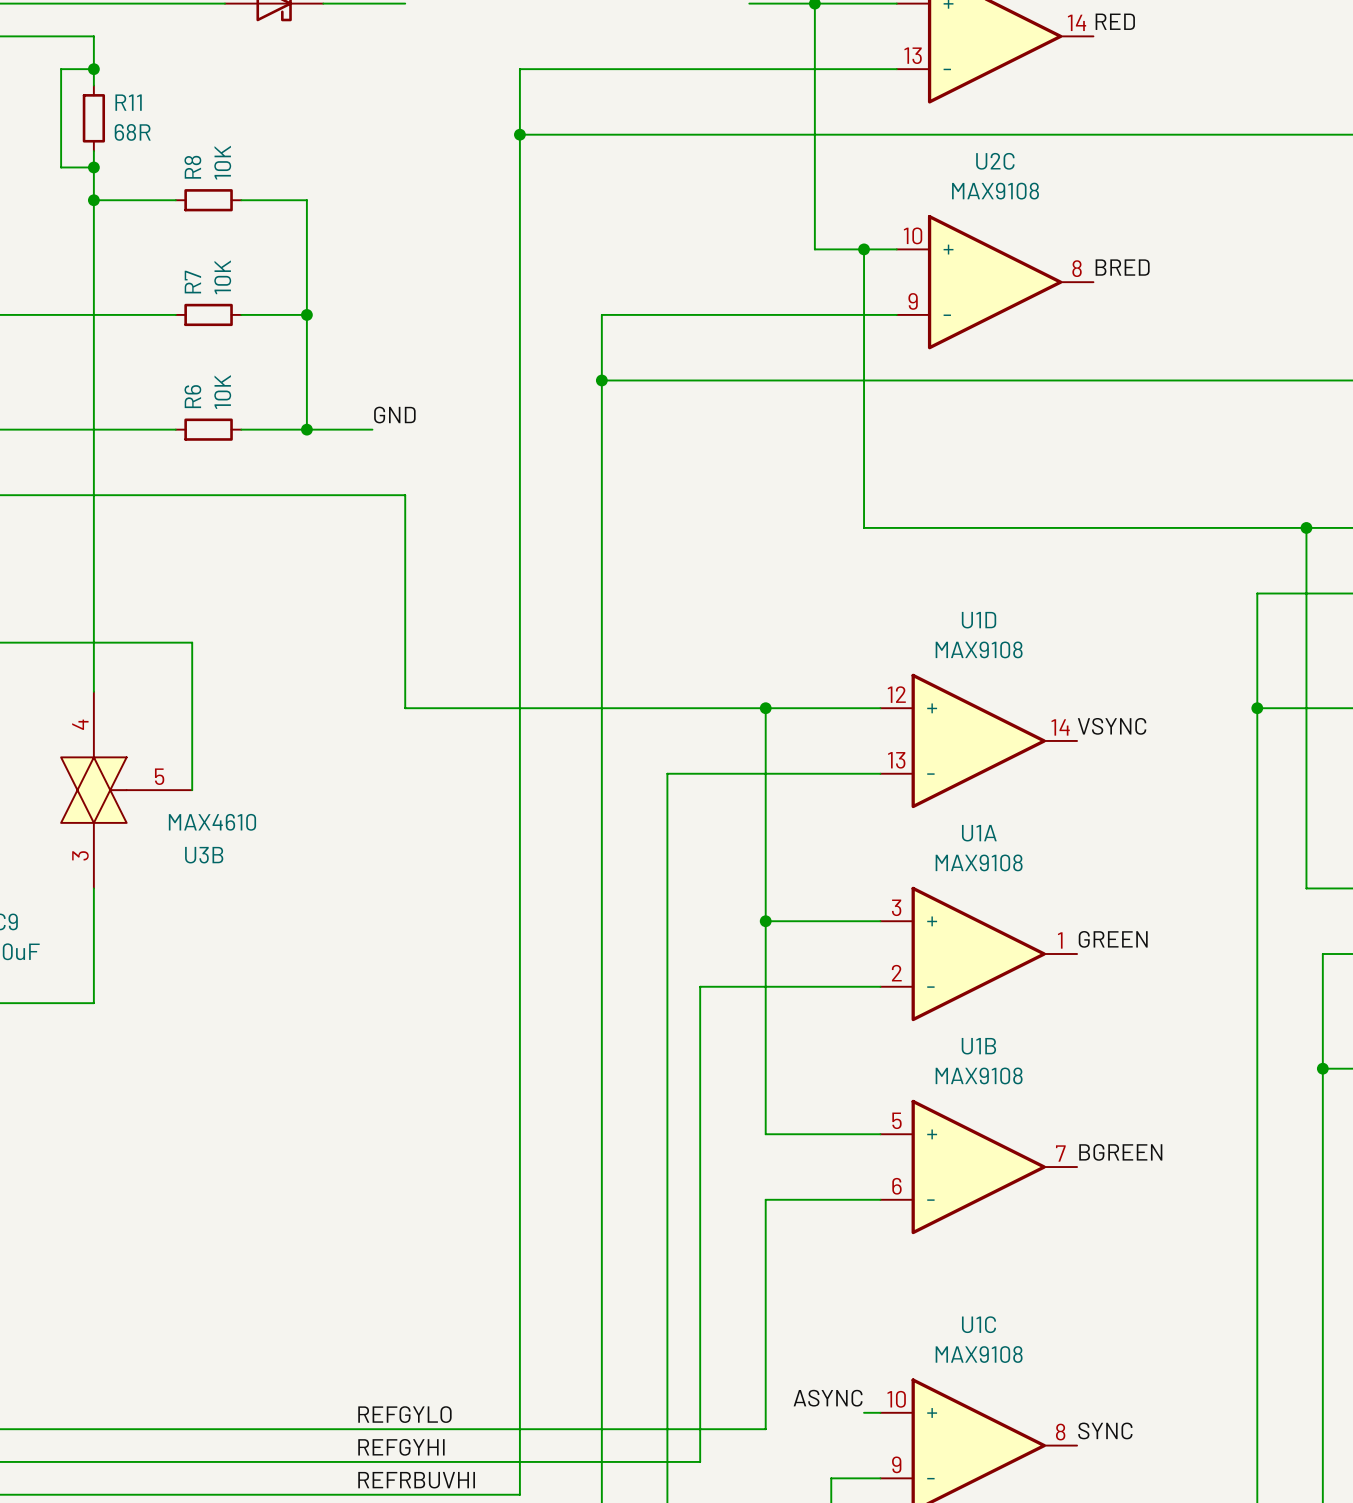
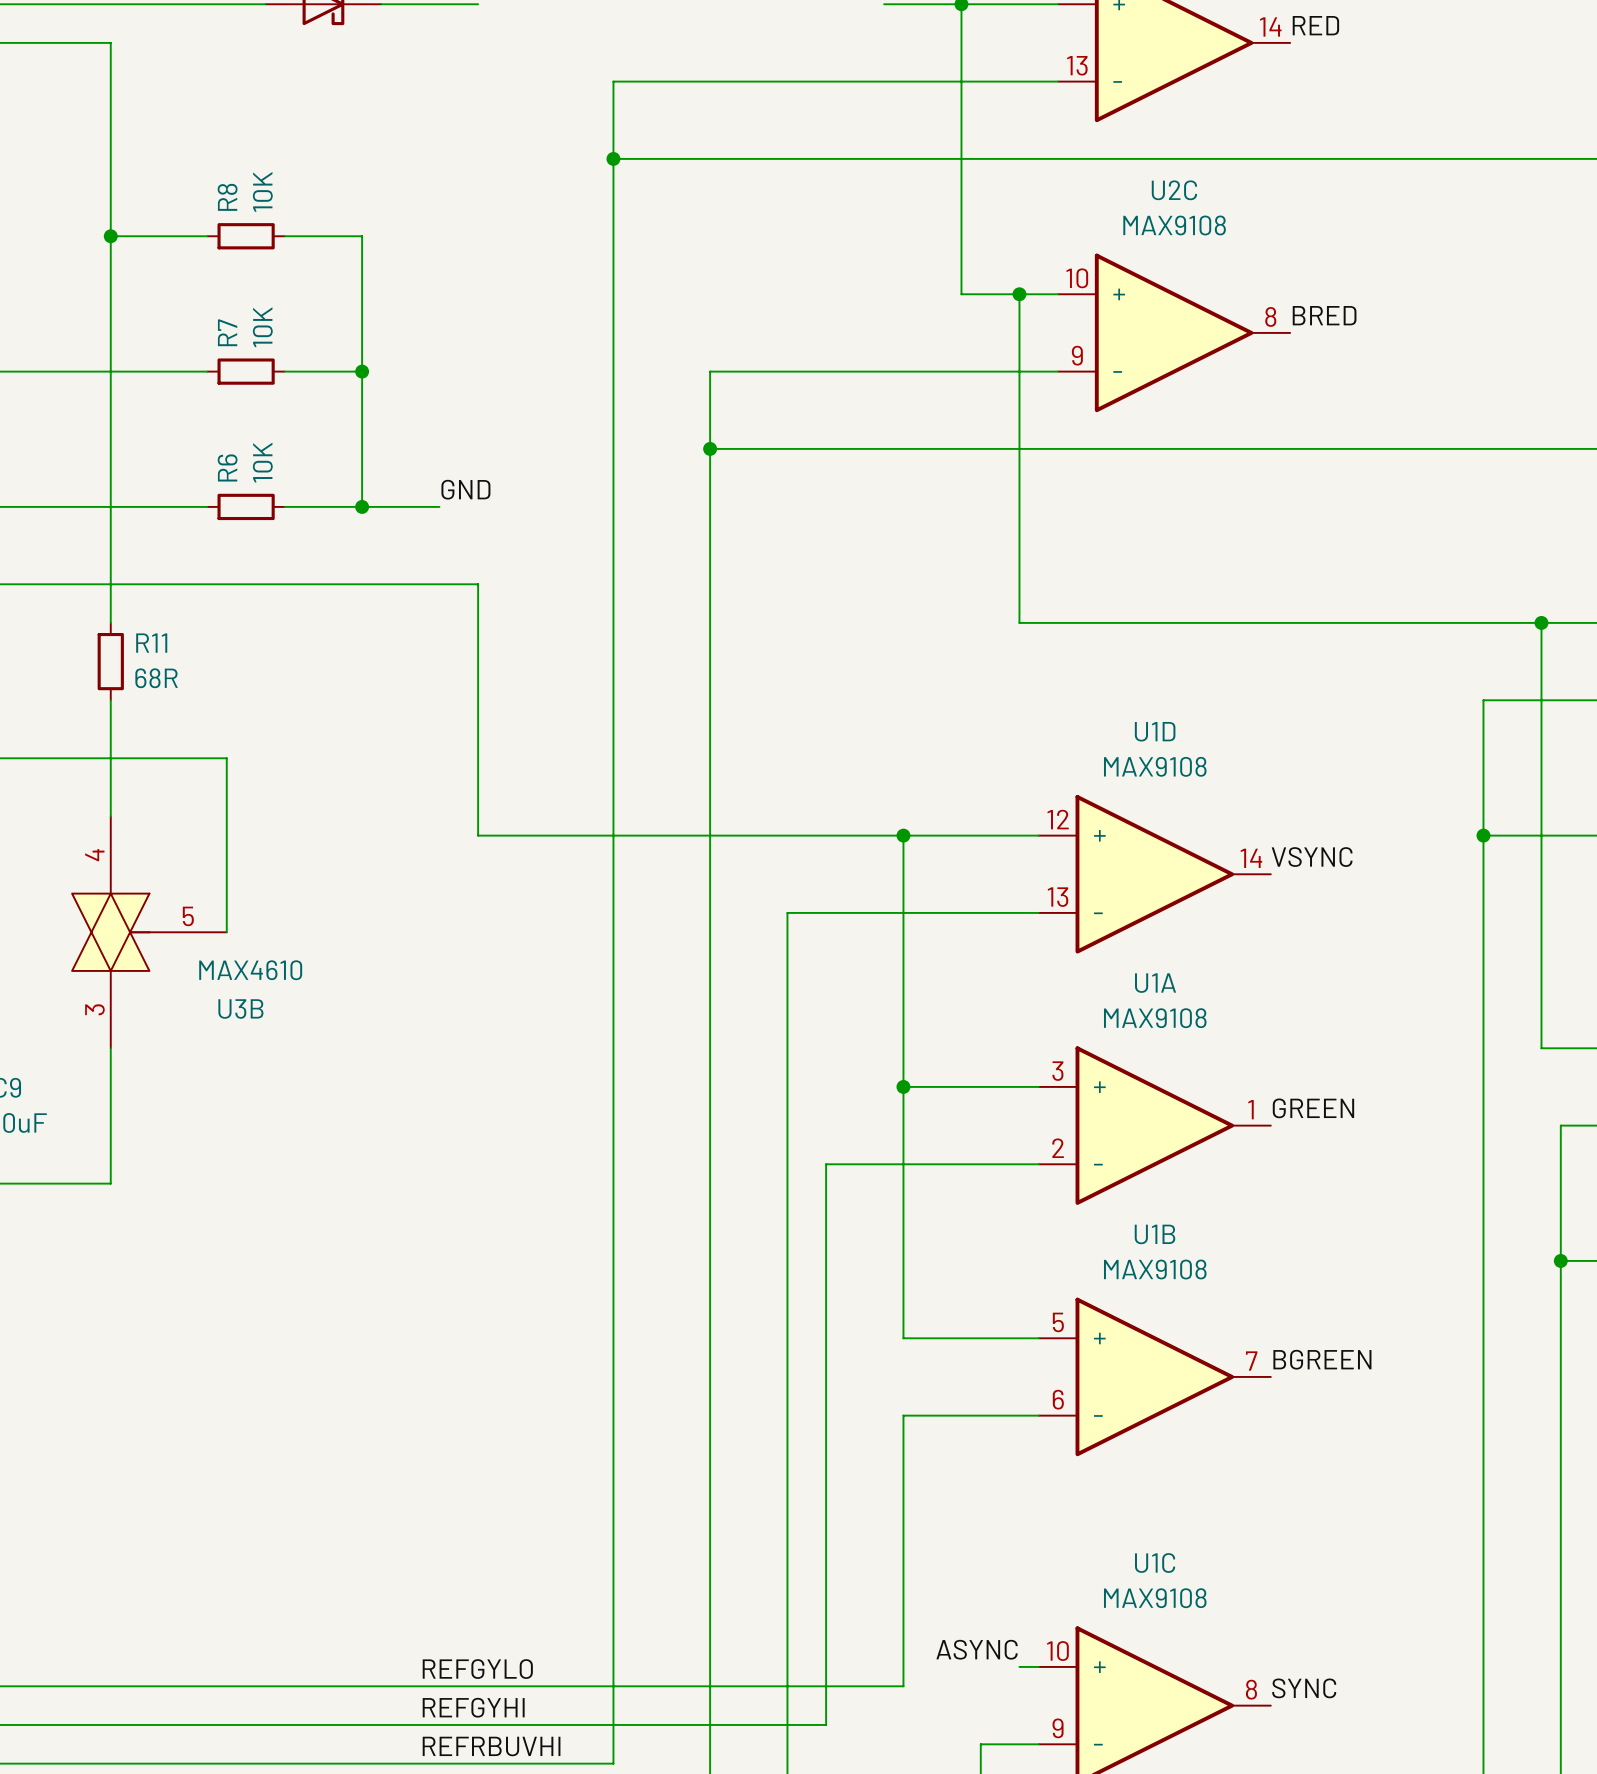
wire: (93, 69) (61, 69) (61, 167) (93, 167) -> none
junction: (93, 69) -> none
wire: none -> (110, 100) (110, 178)
R11 position: (93, 118) -> (110, 661)
junction: (93, 167) -> none
wire: (93, 527) (93, 593) -> none

